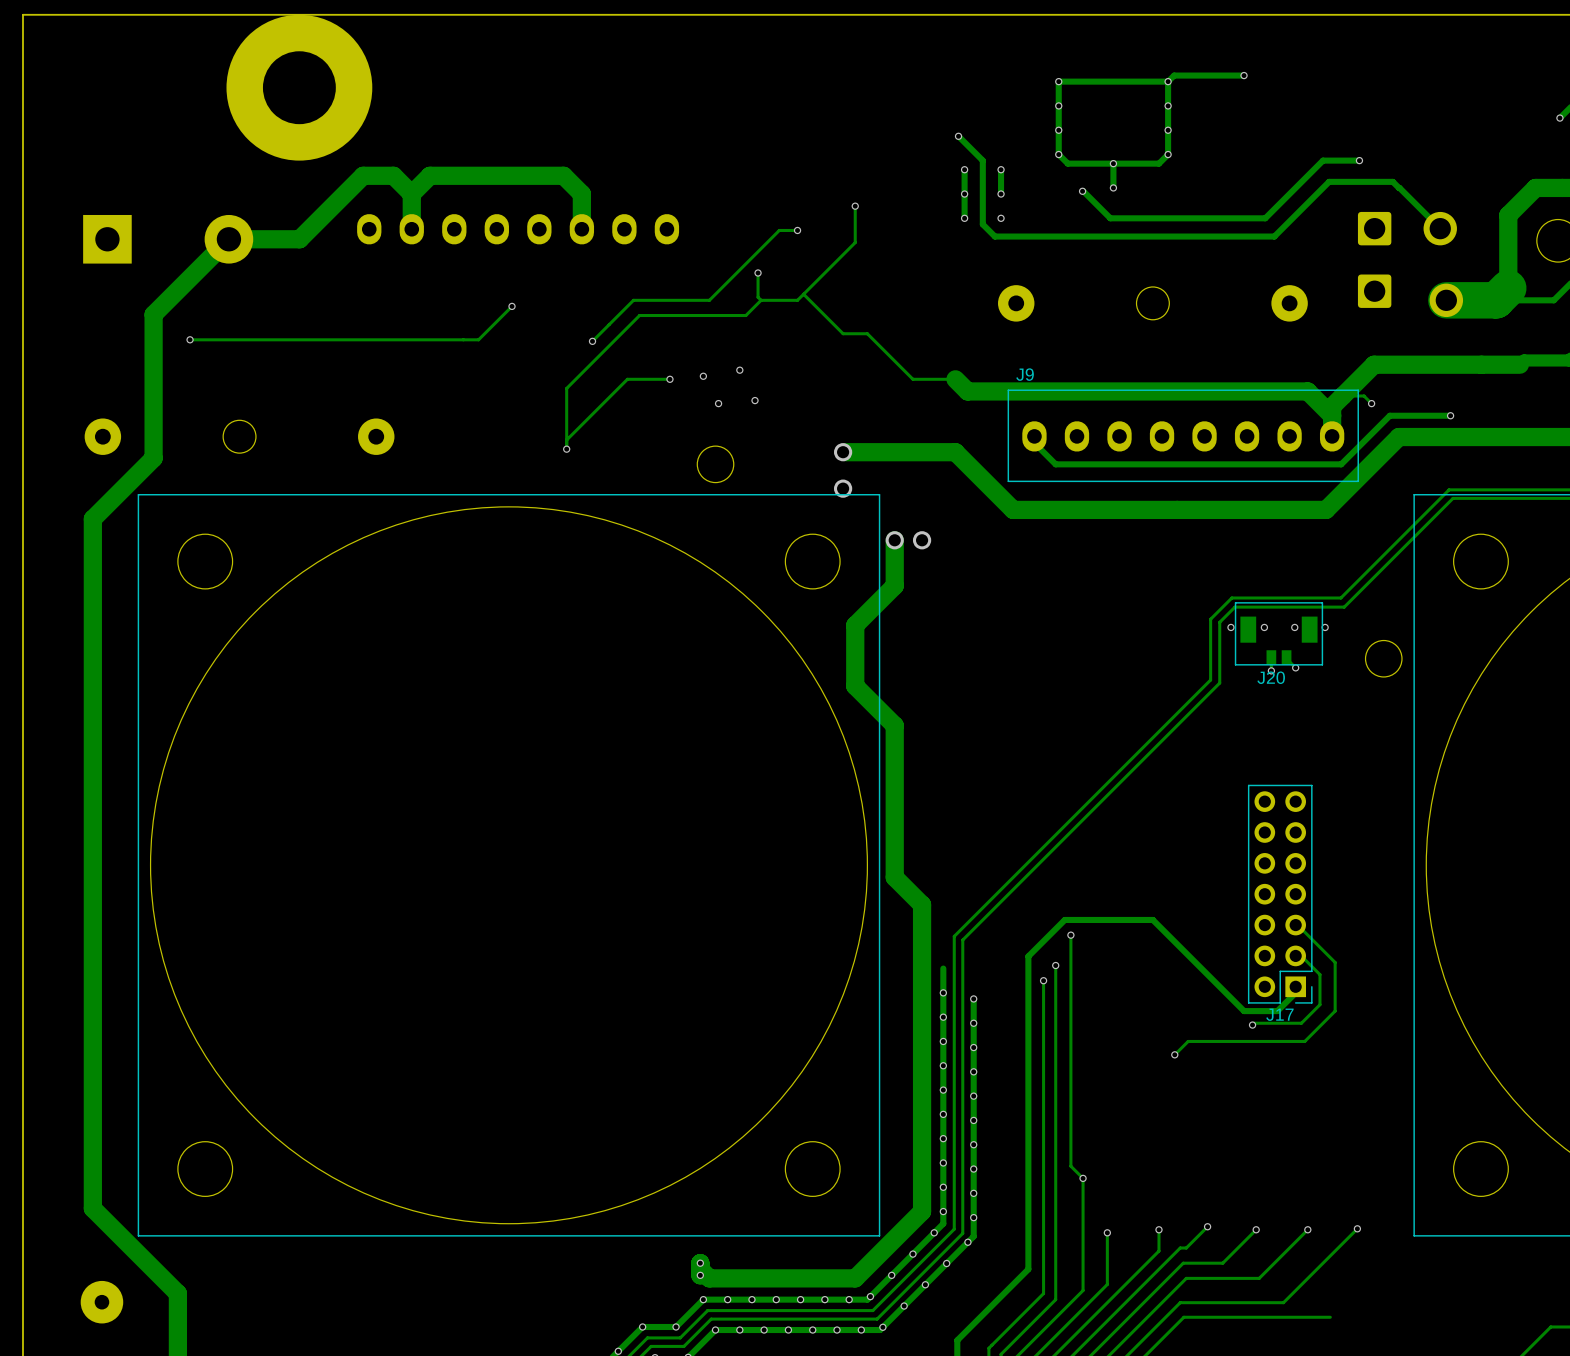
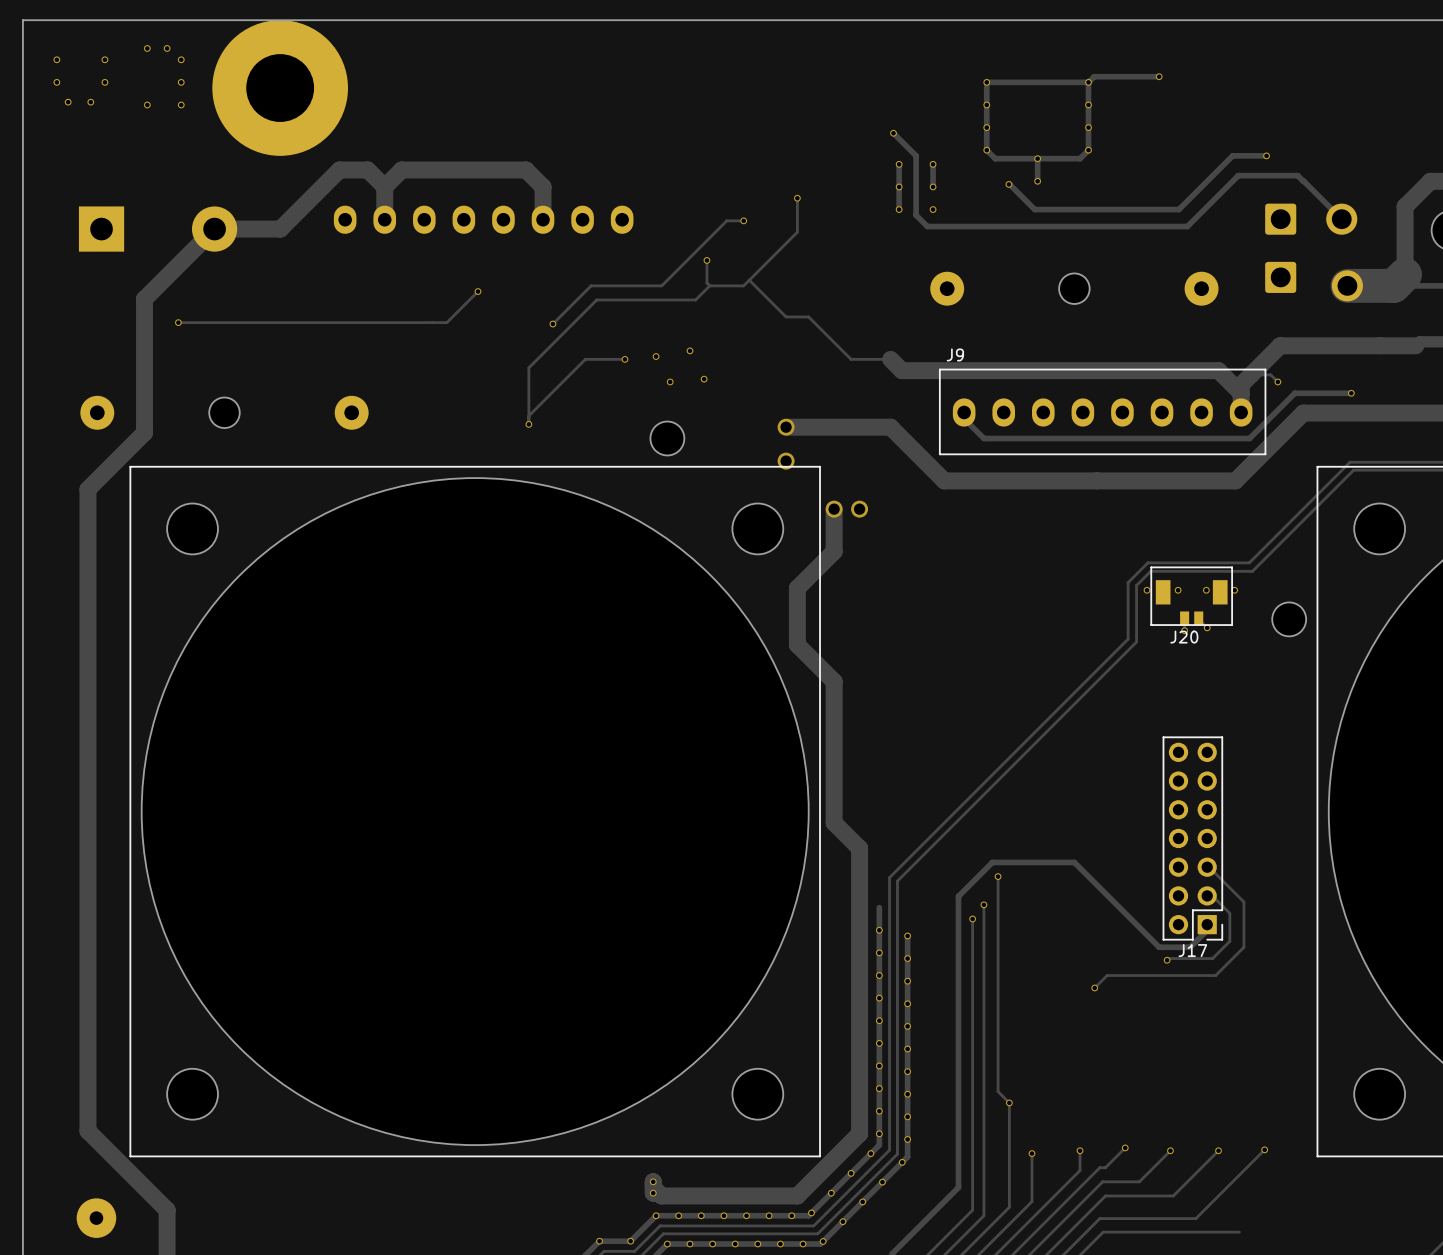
via: none -> (147, 48)
via: none -> (167, 48)
via: none -> (56, 59)
via: none -> (104, 59)
via: none -> (181, 59)
via: none -> (56, 82)
via: none -> (104, 82)
via: none -> (181, 82)
via: none -> (68, 102)
via: none -> (90, 102)
via: none -> (147, 104)
via: none -> (181, 104)

